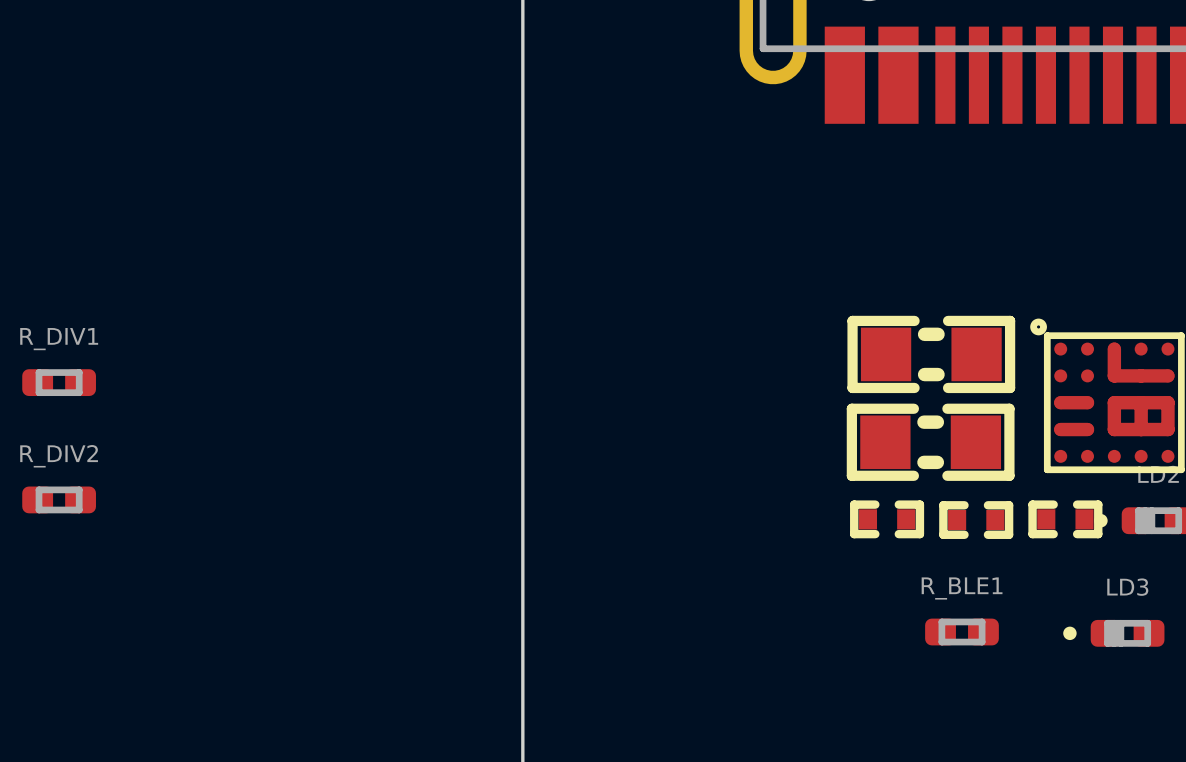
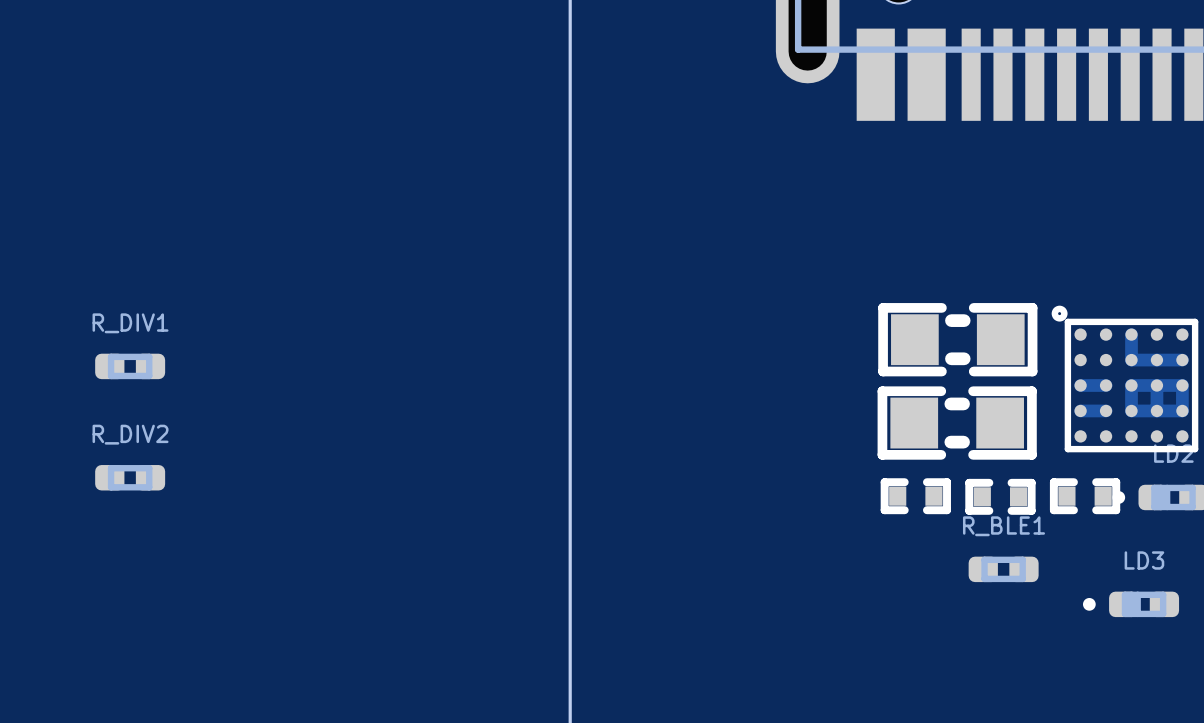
R_BLE1 position: (961, 632) -> (1003, 569)

